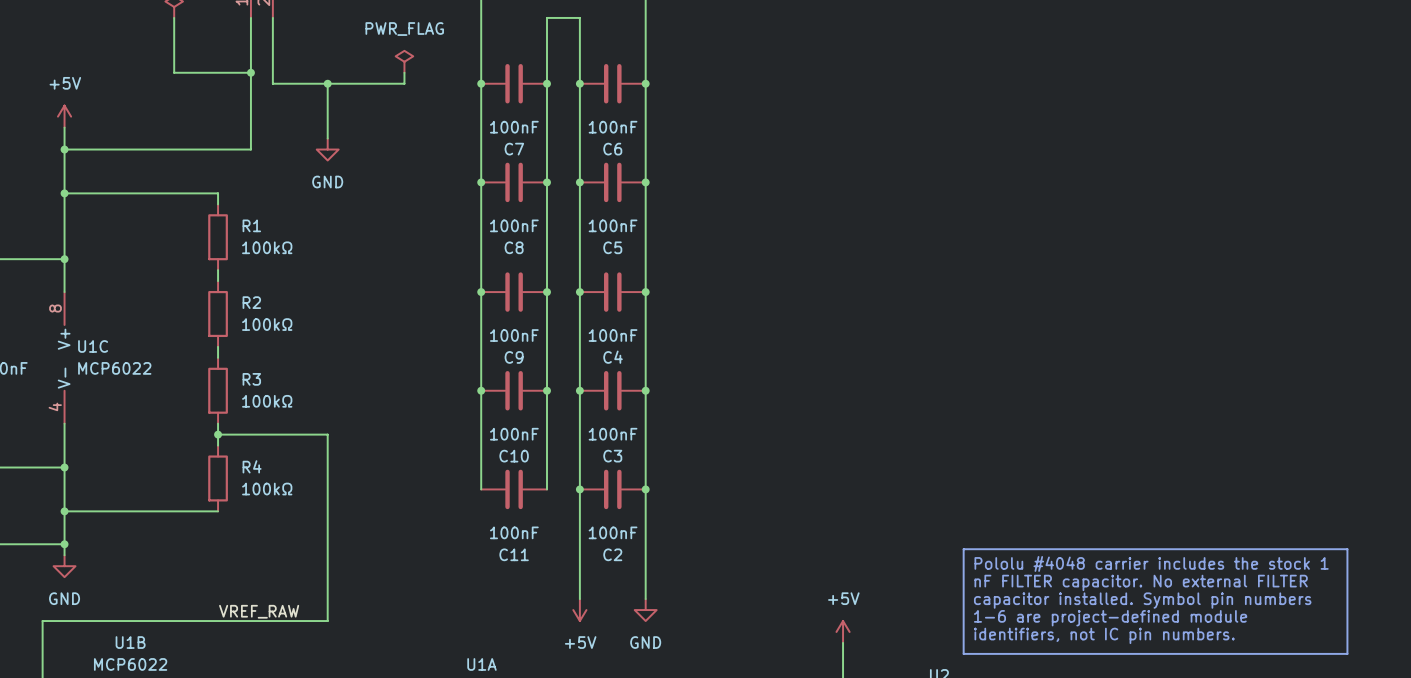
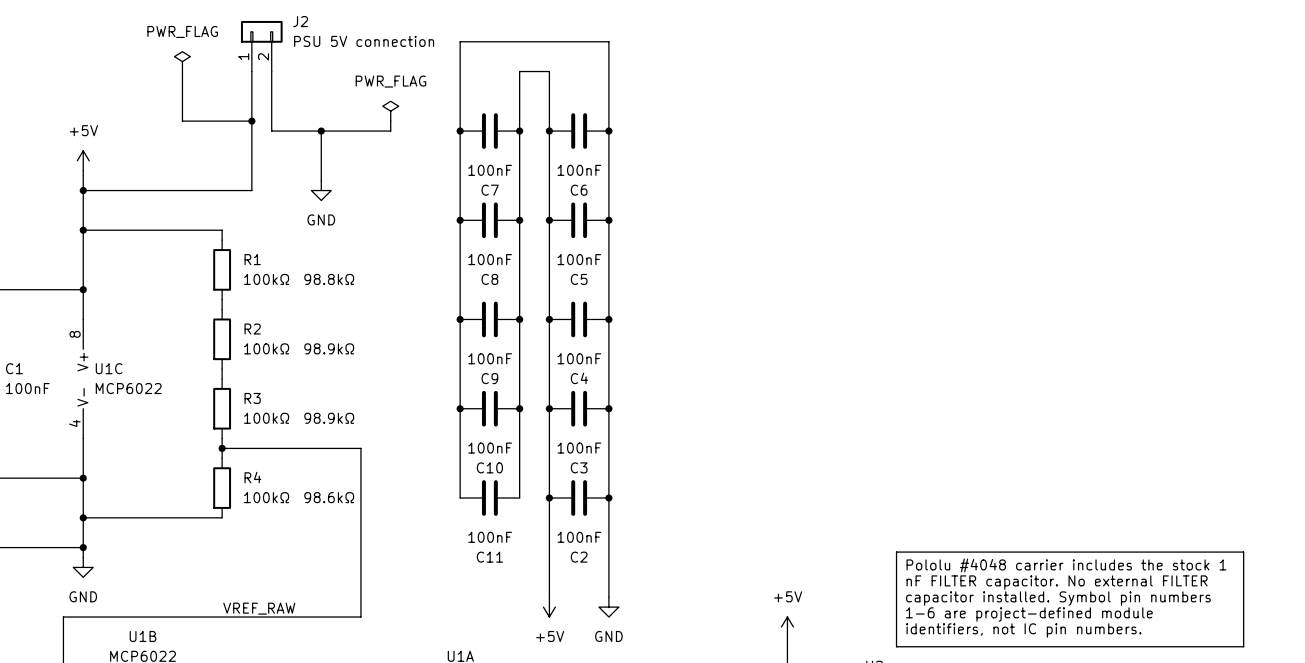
R1 text: none -> 98.8kΩ (329, 279)
R2 text: none -> 98.9kΩ (329, 348)
R3 text: none -> 98.9kΩ (329, 418)
wire: (327, 434) (327, 621) -> (321, 448) (360, 448) (360, 617) (321, 617)
R4 text: none -> 98.6kΩ (329, 497)

